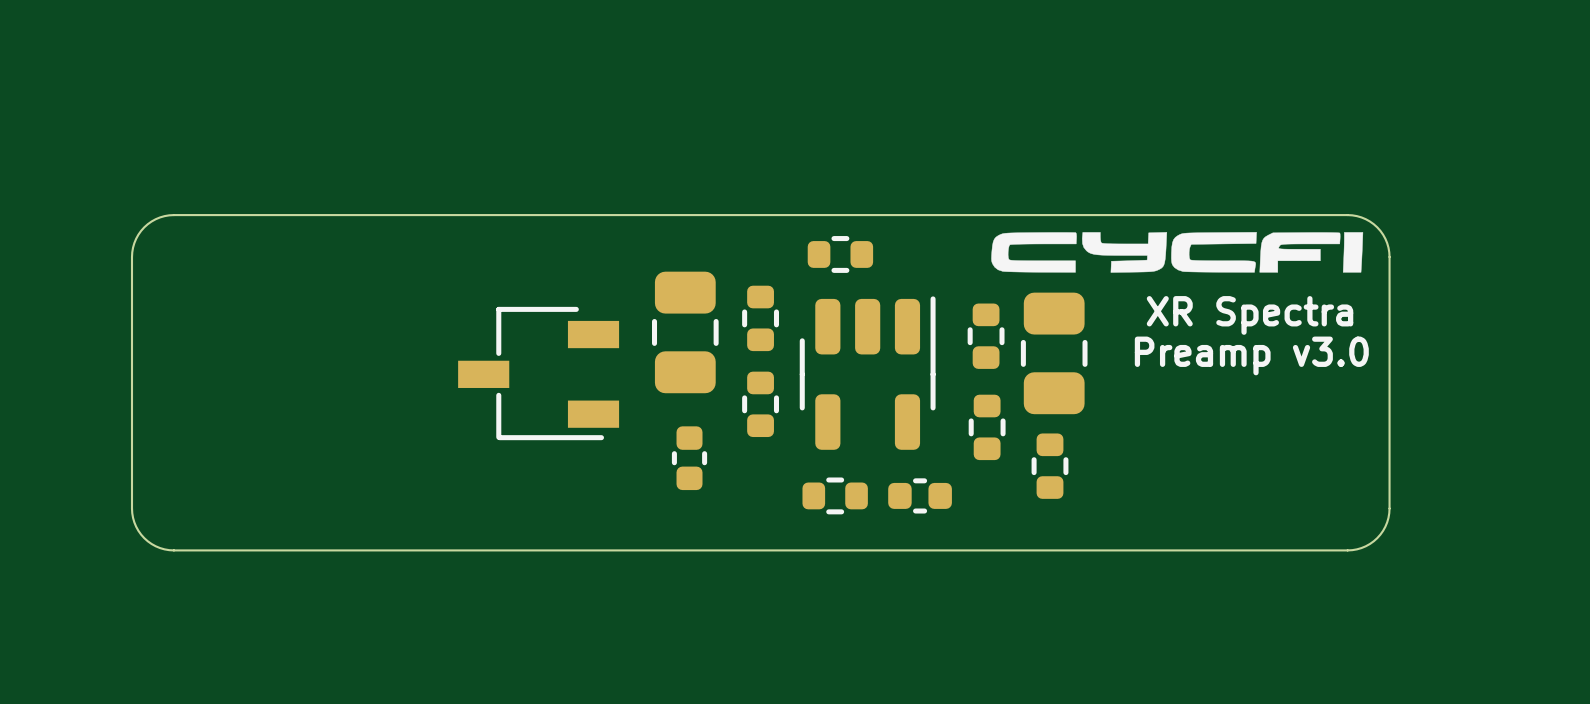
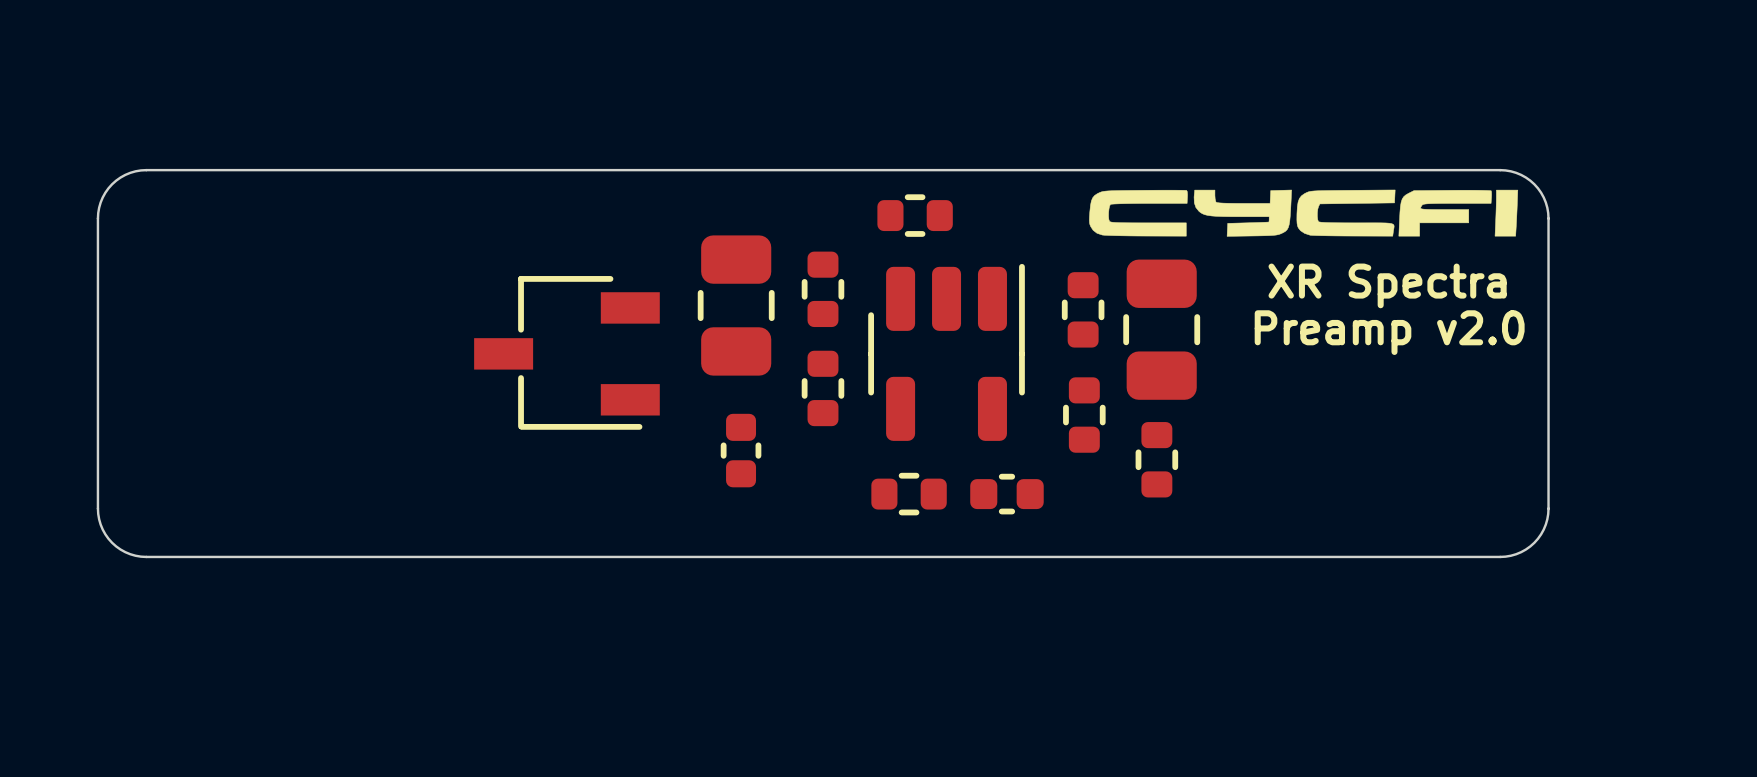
text: Preamp v3.0 (1251, 355) -> Preamp v2.0 (1389, 332)

